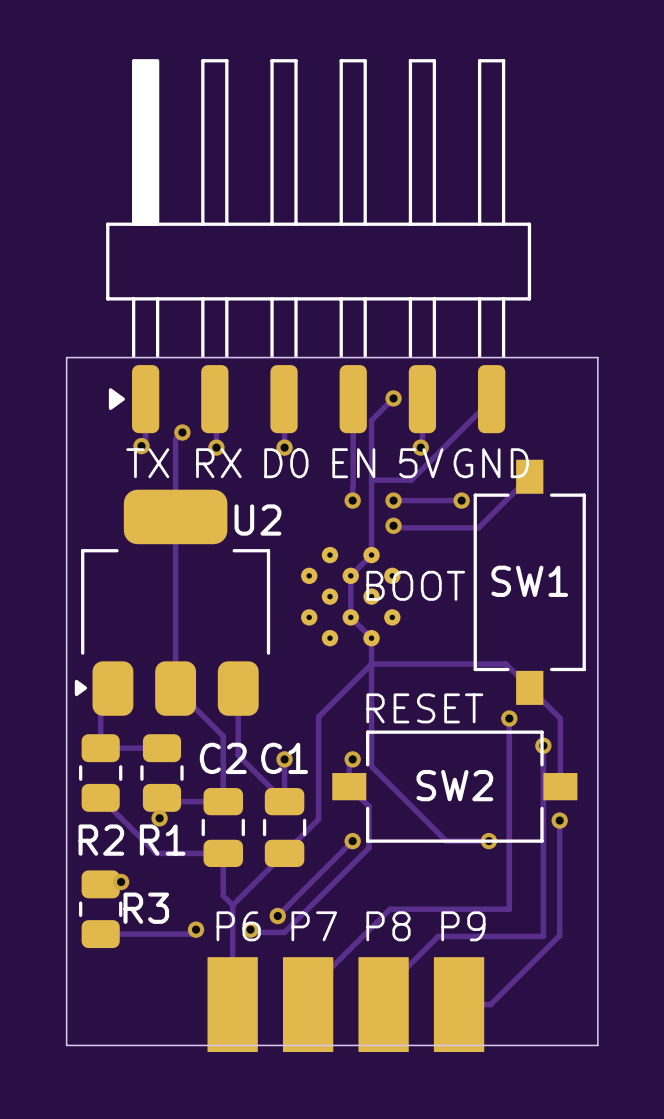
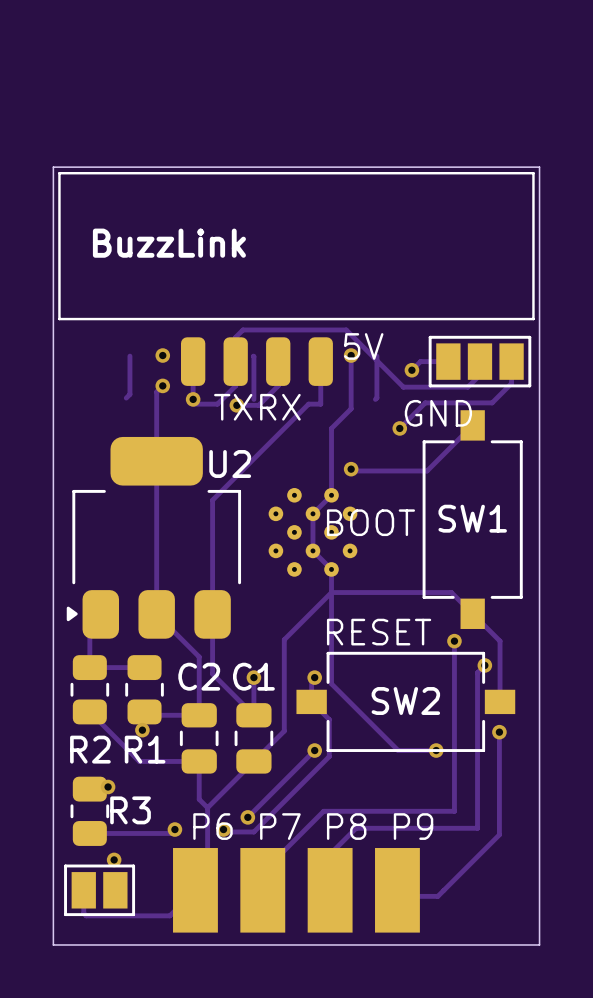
line: none -> (533, 173) (59, 173) (59, 319) (533, 319) (533, 173)
part: (318, 246) -> none
text: none -> BuzzLink (169, 243)
board edge: (597, 357) (66, 357) (66, 1045) (597, 1045) (597, 357) -> (539, 167) (539, 944) (53, 944) (53, 167) (539, 167)
via: none -> (162, 355)
track: (393, 398) (371, 420) (371, 480) (411, 480) (491, 399) -> (351, 355) (351, 408) (331, 428)
track: (353, 399) (352, 500) -> none
part: none -> (193, 361)
part: none -> (235, 361)
track: none -> (278, 361) (278, 385) (258, 405) (236, 405)
part: none -> (278, 361)
track: none -> (320, 361) (320, 404) (308, 404) (212, 500) (212, 614)
part: none -> (320, 361)
track: none -> (448, 361) (420, 361) (411, 370)
track: none -> (479, 361) (479, 375) (467, 387) (403, 387) (346, 329) (243, 329) (235, 337) (235, 385) (217, 404) (193, 404)
part: none -> (479, 361)
track: none -> (511, 361) (511, 383) (492, 402) (425, 402) (399, 428)
via: none -> (411, 370)
via: (141, 446) -> none
via position: (284, 447) -> (236, 405)
via: (420, 447) -> none
text position: TX (147, 463) -> TX (233, 407)
text position: RX (218, 463) -> RX (280, 407)
text: D0 (286, 463) -> none
text: EN (353, 463) -> none
text position: 5V (421, 463) -> 5V (363, 346)
via: none -> (399, 428)
via: (352, 500) -> none
via: (393, 500) -> none
track: (461, 500) (393, 500) -> none
via: (461, 500) -> none
track: (543, 745) (543, 936) (438, 936) (383, 991) (383, 1004) -> (484, 665) (477, 672) (477, 828) (356, 828) (324, 860) (324, 890)
track: (389, 909) (308, 991) (308, 1004) -> (347, 811) (323, 811) (256, 878) (256, 890)
via: none -> (114, 859)
part: none -> (99, 890)
track: none -> (195, 890) (169, 915) (86, 915) (83, 913) (83, 890)
part position: (345, 1004) -> (296, 890)

